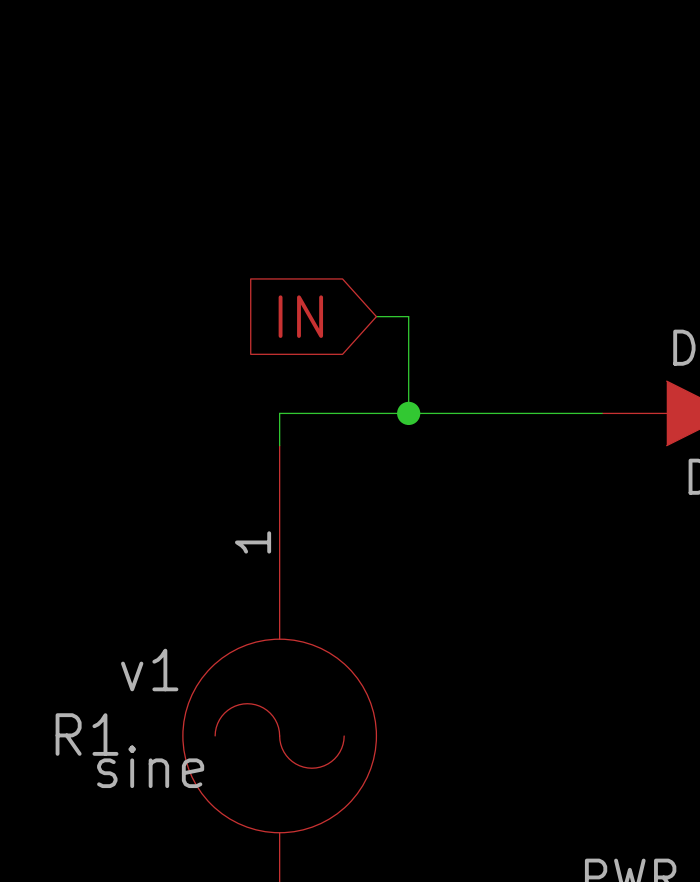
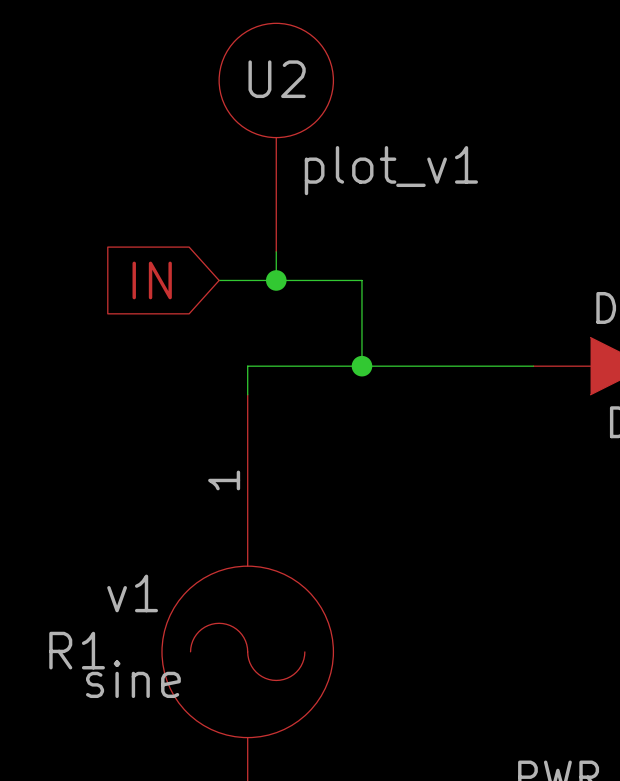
U2: none -> plot_v1 (276, 137)
wire: none -> (276, 251) (276, 280)
wire: none -> (219, 280) (333, 280)
global label position: IN (300, 316) -> IN (152, 280)
junction: none -> (276, 280)

